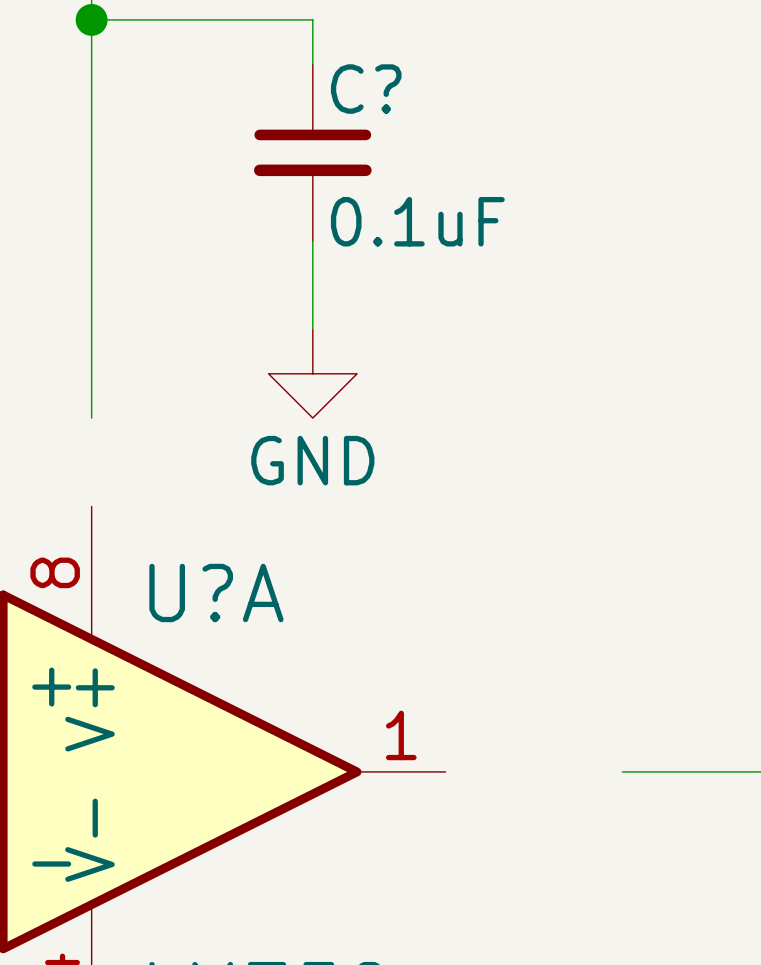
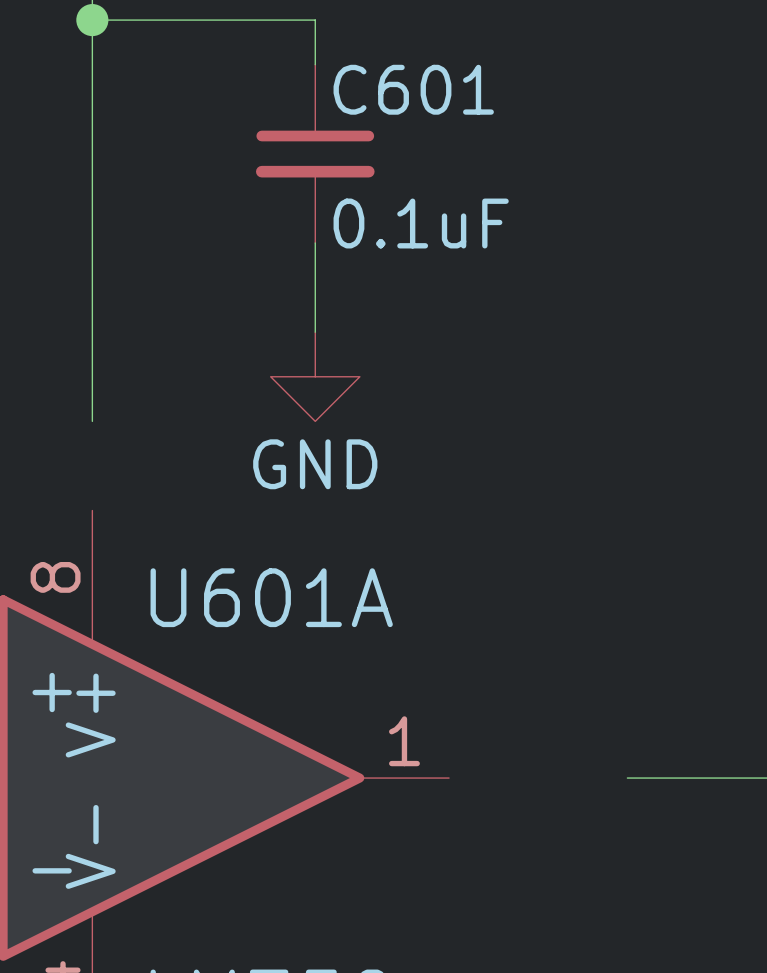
C? name: C? (366, 89) -> C601 (413, 89)
U?A name: U?A (216, 593) -> U601A (271, 597)

